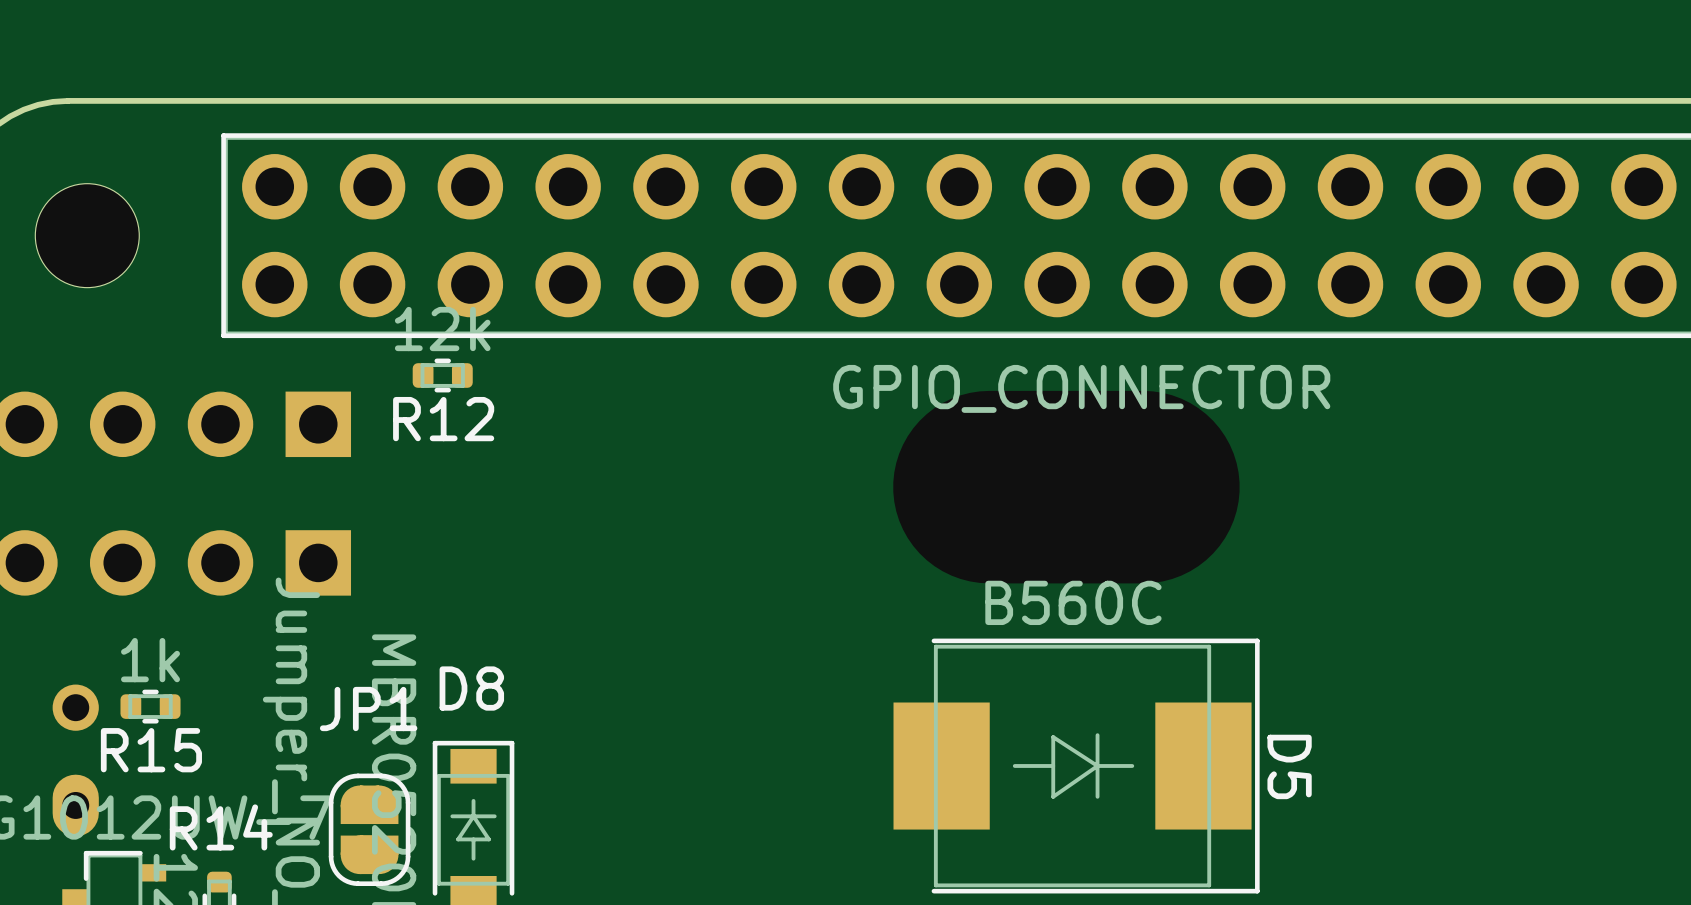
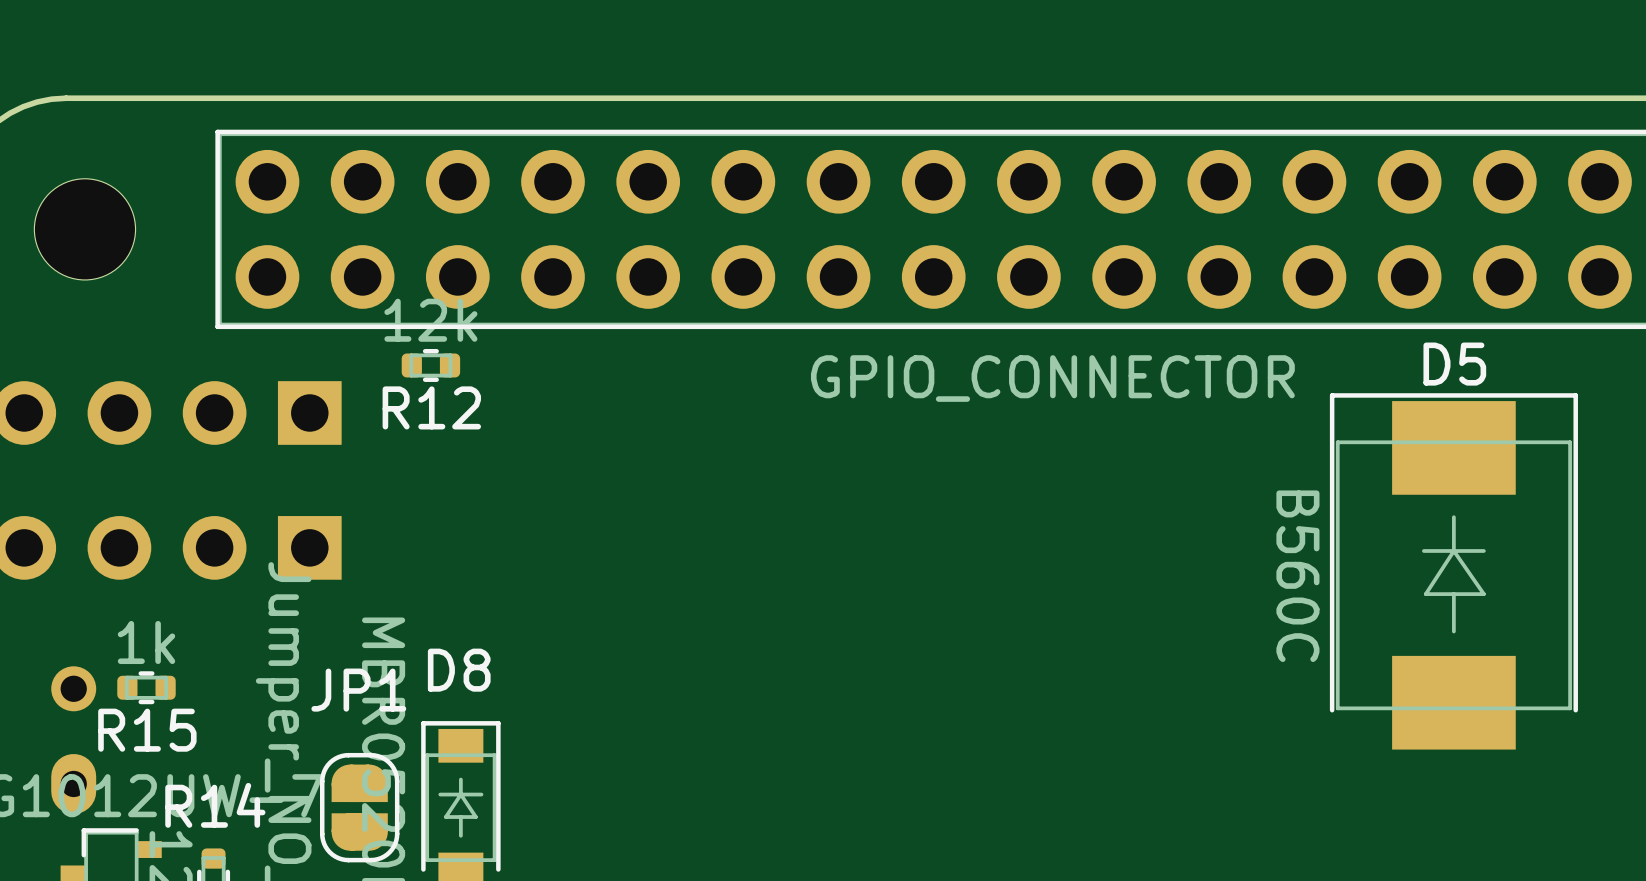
part: (1066, 487) -> none
D5 rotation: 0° (1076, 766) -> 90° counterclockwise (1453, 571)
D5 position: (1076, 766) -> (1453, 571)

